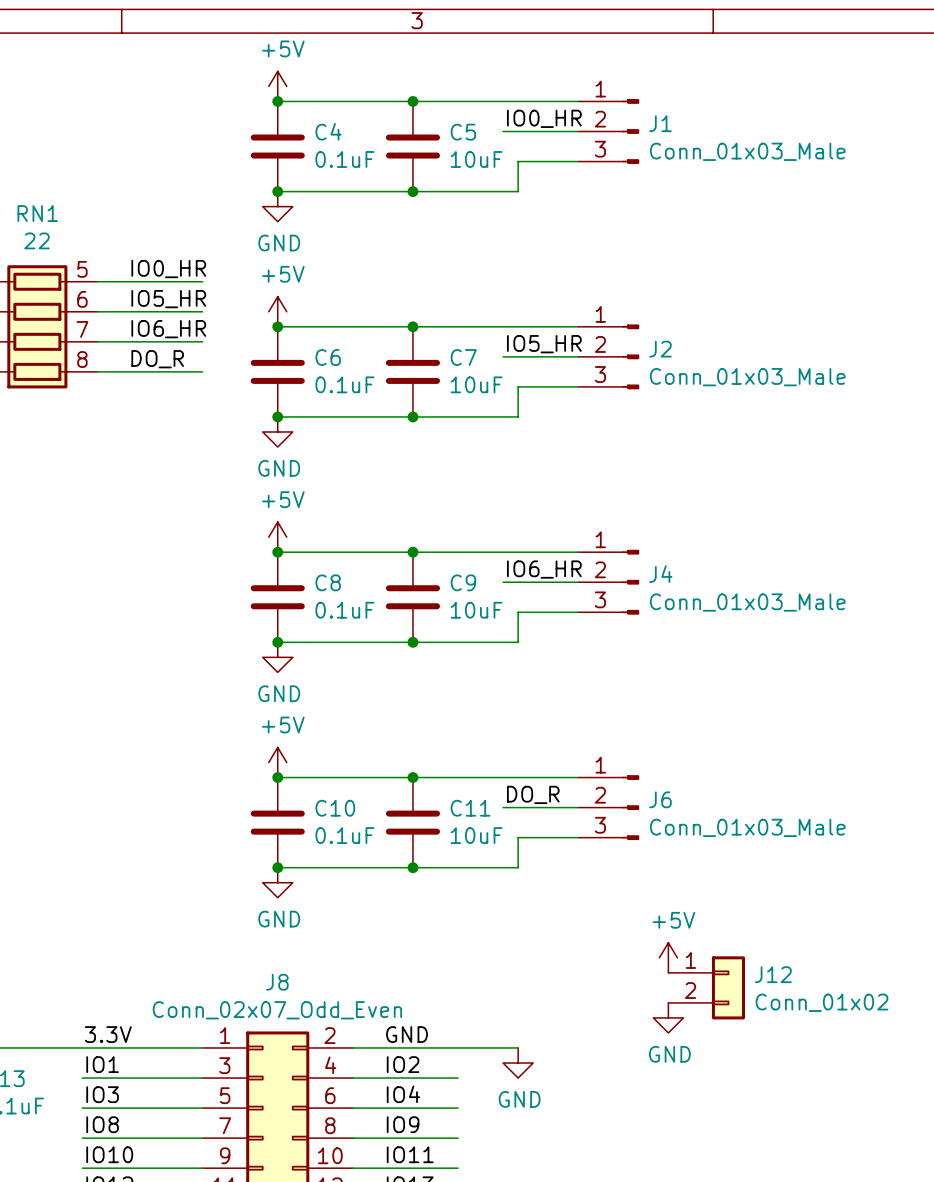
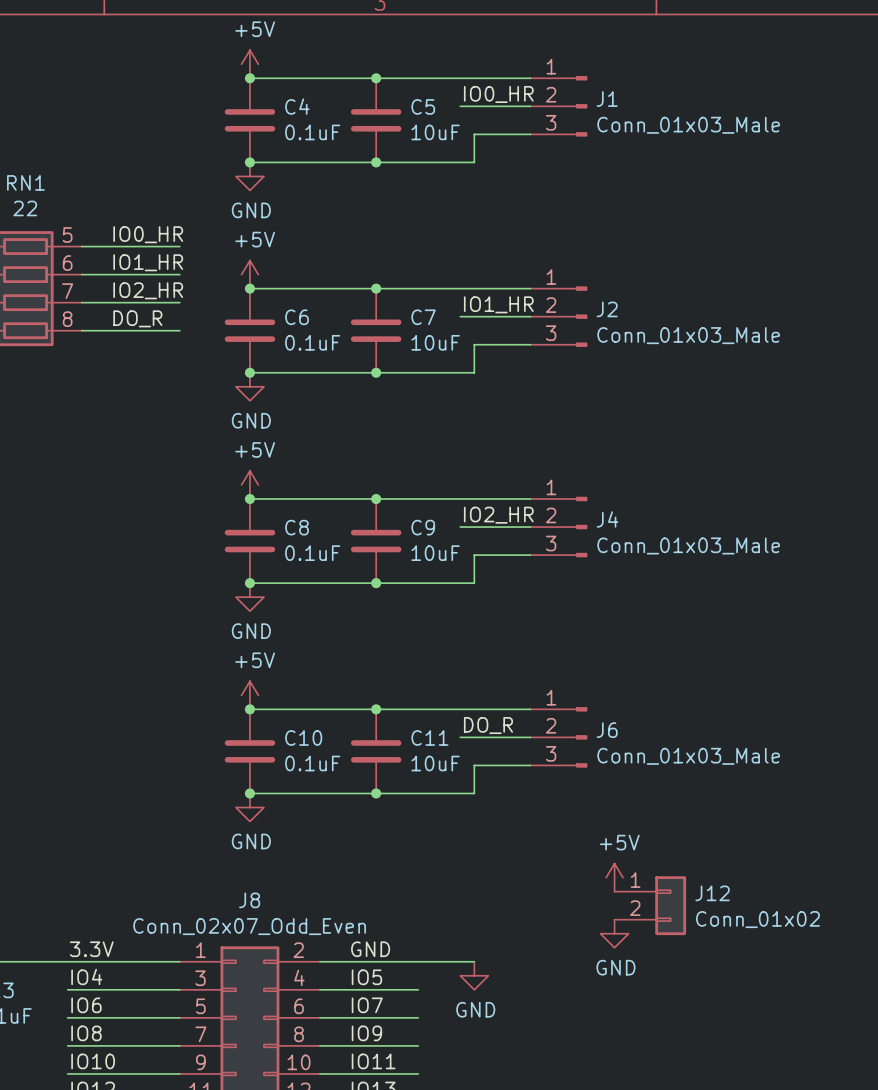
label: IO5_HR (168, 299) -> IO1_HR (148, 262)
label: IO6_HR (168, 329) -> IO2_HR (148, 290)
label: IO5_HR (544, 344) -> IO1_HR (498, 304)
label: IO6_HR (544, 569) -> IO2_HR (498, 515)
label: IO1 (102, 1064) -> IO4 (86, 976)
label: IO2 (403, 1064) -> IO5 (366, 977)
label: IO3 (102, 1094) -> IO6 (86, 1005)
label: IO4 (403, 1094) -> IO7 (367, 1005)

